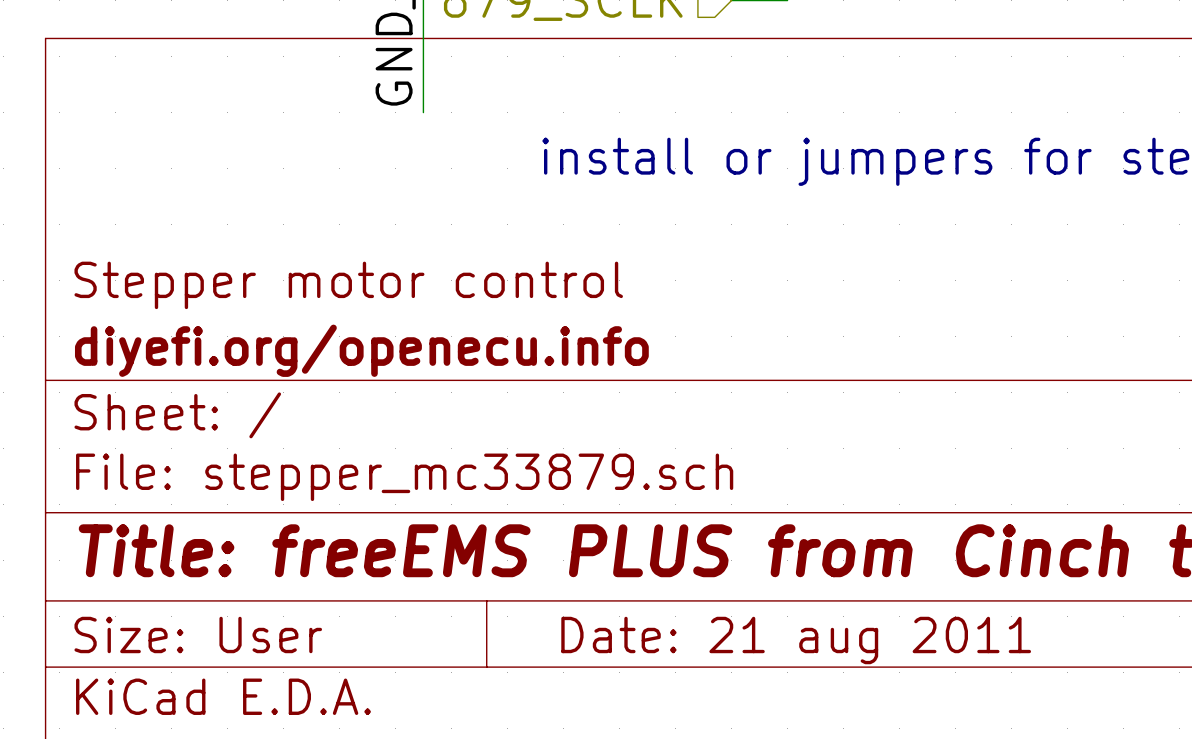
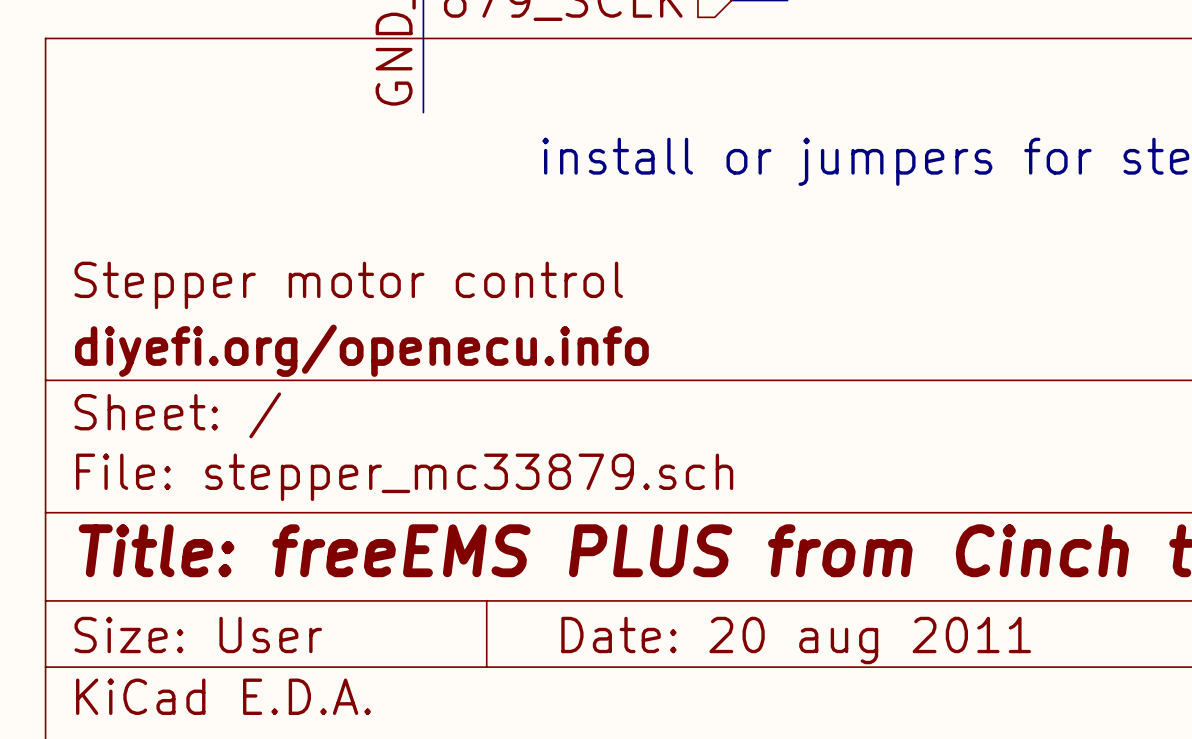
title block: Date: 21 aug 2011 (796, 640) -> Date: 20 aug 2011 (796, 640)

